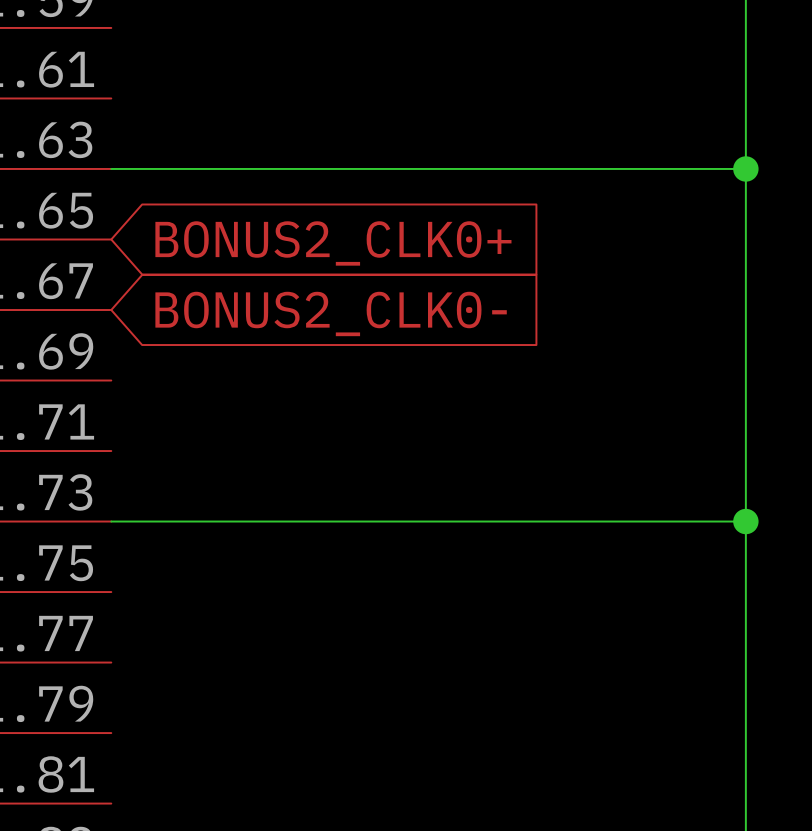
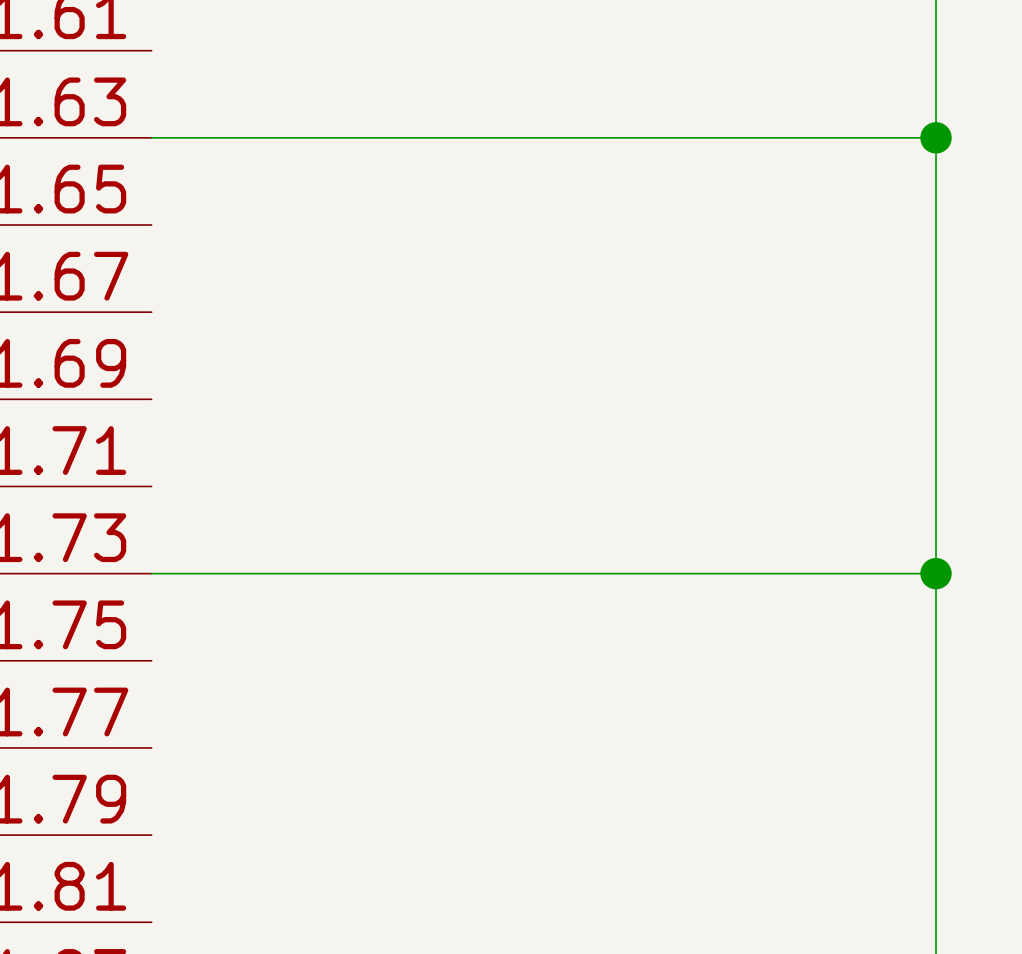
global label: BONUS2_CLK0+ (333, 243) -> none
global label: BONUS2_CLK0- (331, 313) -> none

